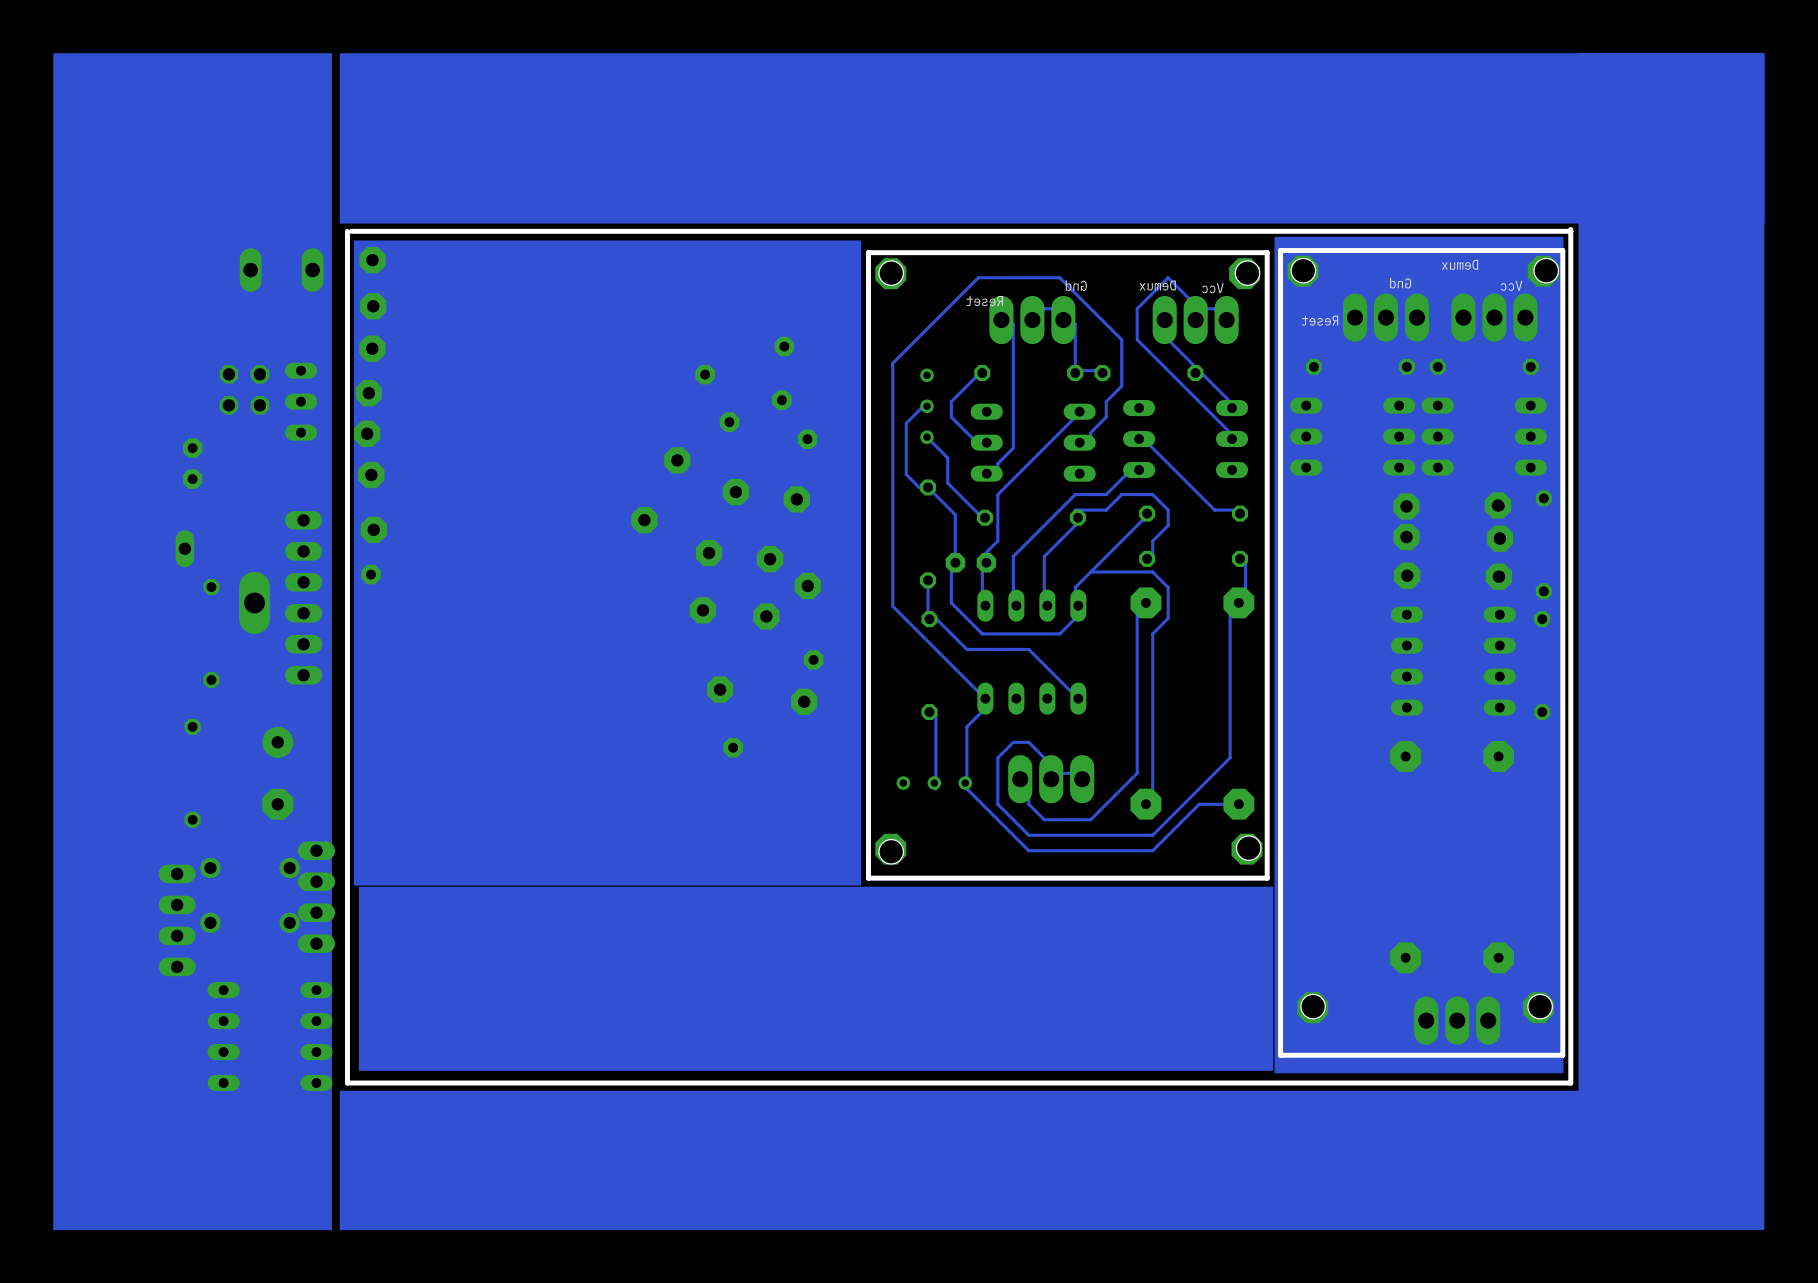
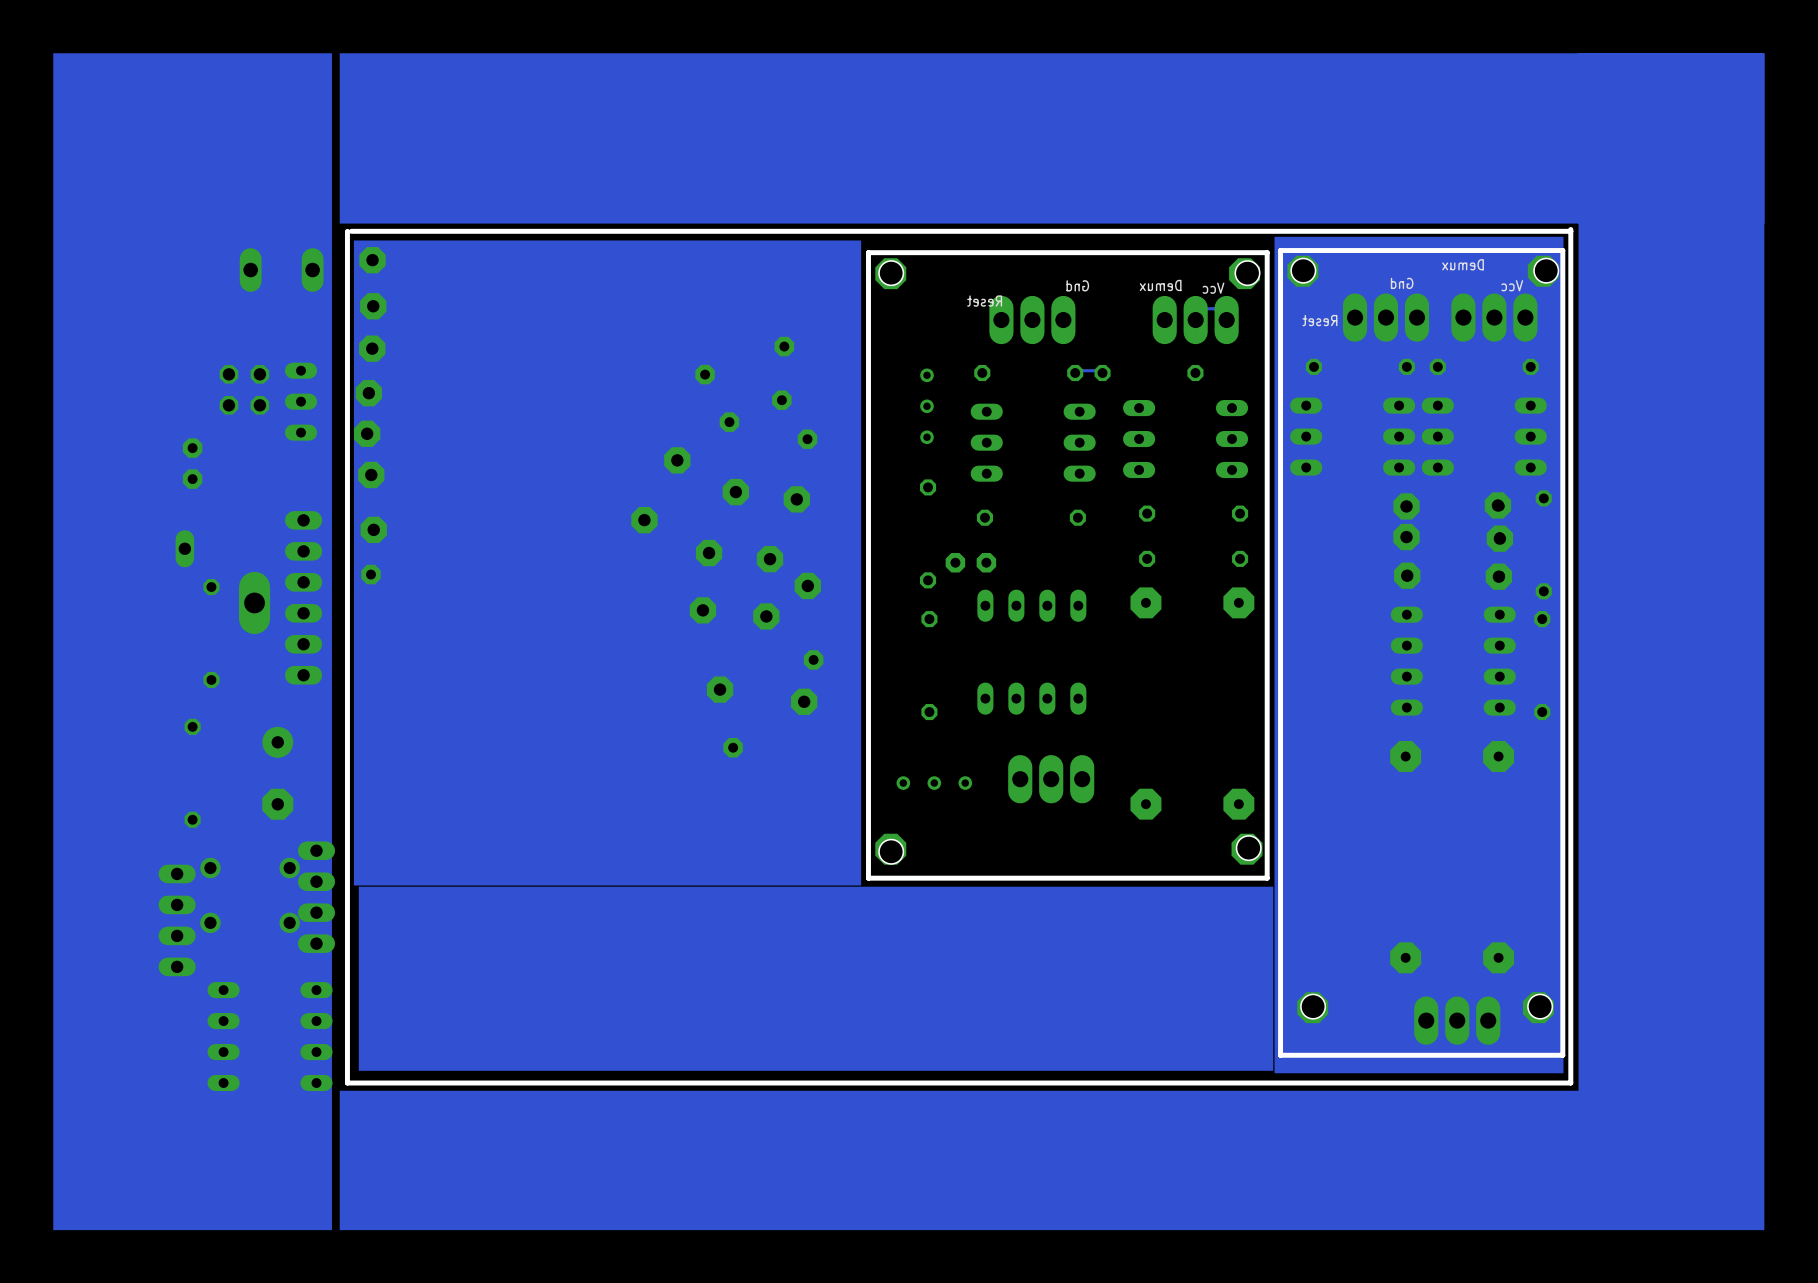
bottom track: (1001, 320) (1013, 324) (1013, 448) (997, 463) (997, 479) (986, 473) -> none
bottom track: (1032, 320) (1044, 308) (1059, 308) (1063, 320) (1075, 324) (1075, 373) -> none
bottom track: (1164, 320) (1168, 324) (1168, 339) (1230, 401) (1232, 408) -> none
bottom track: (1195, 320) (1199, 308) (1168, 277) (1137, 308) (1137, 339) (1230, 432) (1232, 439) -> none
bottom track: (982, 373) (982, 370) (951, 401) (951, 417) (982, 448) (986, 442) -> none
bottom track: (927, 406) (923, 406) (906, 423) (906, 474) (919, 487) (928, 487) (955, 514) (955, 563) -> none
bottom track: (1079, 411) (997, 494) (997, 541) (982, 556) (986, 562) (982, 572) (982, 602) (985, 605) -> none
bottom track: (927, 437) (947, 457) (947, 483) (982, 517) (984, 517) -> none
bottom track: (1139, 439) (1137, 432) (1214, 510) (1245, 510) (1240, 513) -> none
bottom track: (1079, 442) (1090, 448) (1090, 432) (1106, 417) (1106, 401) (1121, 386) (1121, 339) (1059, 277) (978, 277) (892, 363) (892, 606) (985, 698) (982, 711) (966, 726) (966, 788) -> none
bottom track: (1139, 470) (1137, 463) (1106, 494) (1075, 494) (1013, 556) (1013, 602) (1016, 605) -> none
bottom track: (1147, 513) (1152, 510) (1075, 587) (1075, 602) (1078, 605) (1075, 618) (1059, 633) (982, 633) (951, 602) (951, 572) (955, 562) -> none
bottom track: (1147, 558) (1152, 556) (1152, 541) (1168, 525) (1168, 510) (1152, 494) (1121, 494) (1106, 510) (1075, 510) (1077, 517) (1075, 525) (1044, 556) (1044, 602) (1047, 605) -> none
bottom track: (1240, 558) (1245, 556) (1245, 602) (1230, 602) (1230, 757) (1152, 835) (1028, 835) (997, 804) (997, 757) (1013, 742) (1028, 742) (1044, 757) (1044, 773) (1051, 779) (1059, 773) (1075, 773) (1082, 779) -> none
bottom track: (1090, 572) (1152, 572) (1168, 587) (1168, 618) (1152, 633) (1152, 804) (1145, 804) -> none
bottom track: (928, 580) (928, 617) (935, 618) (966, 649) (1028, 649) (1078, 698) -> none
bottom track: (1145, 602) (1137, 602) (1137, 773) (1090, 819) (1044, 819) (1028, 804) (1028, 788) (1020, 779) -> none
bottom track: (929, 712) (935, 711) (935, 788) (934, 783) -> none
bottom track: (966, 788) (1028, 850) (1152, 850) (1199, 804) (1238, 804) -> none

